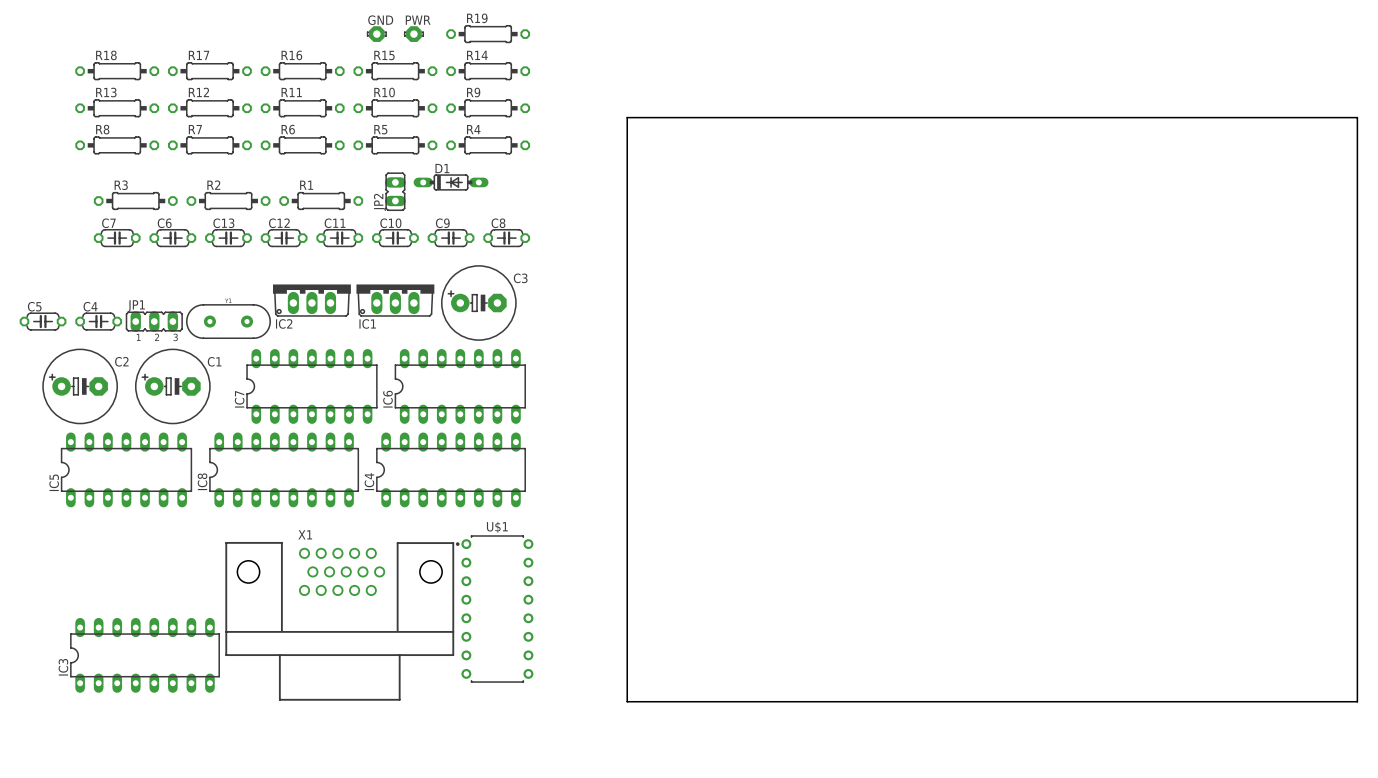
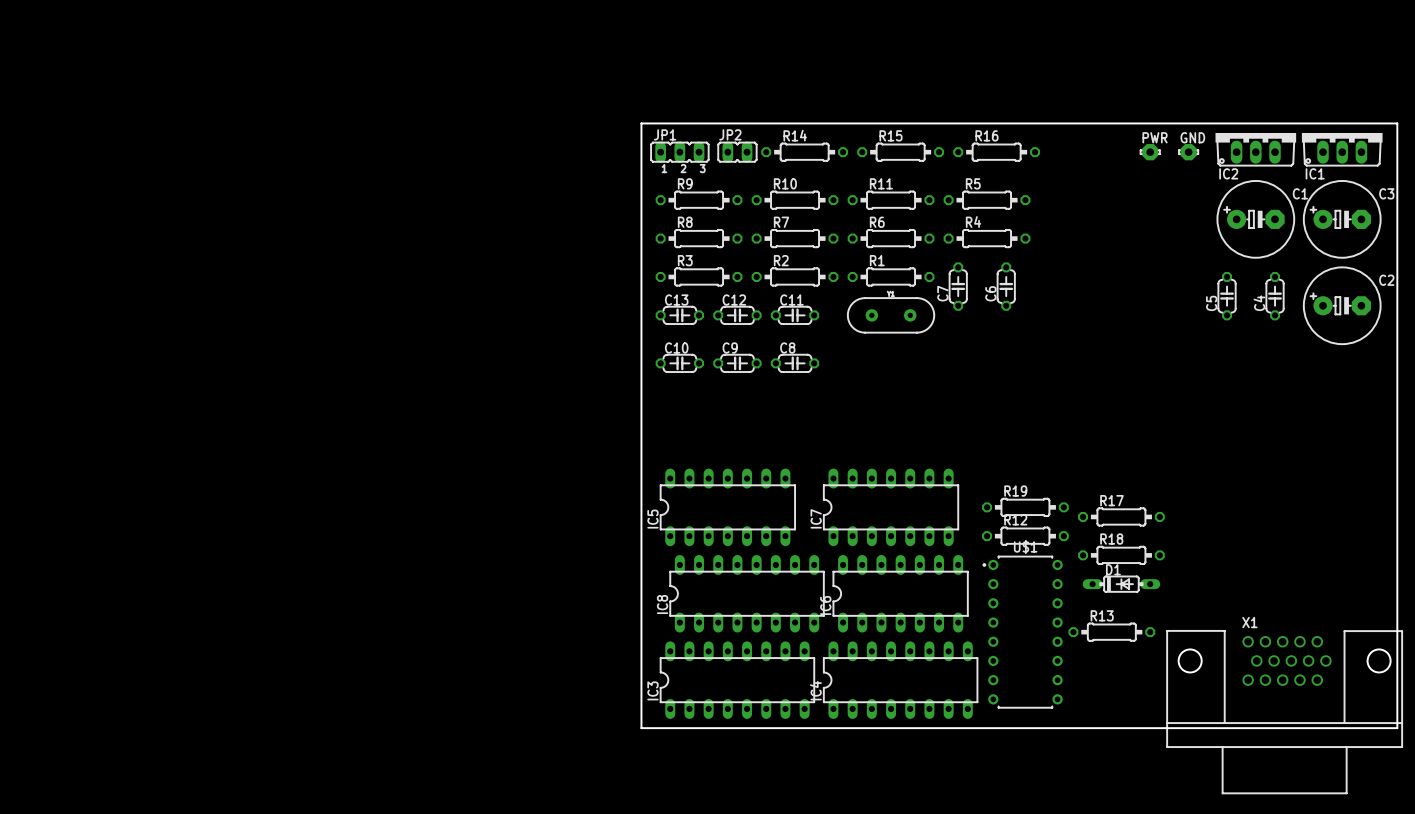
GND: (376, 34) -> none
PWR: (413, 34) -> none
R19 position: (488, 34) -> (1025, 507)
R18 position: (117, 71) -> (1121, 555)
R17 position: (209, 71) -> (1121, 516)
R16 position: (302, 71) -> (996, 152)
R15 position: (395, 71) -> (900, 152)
R14 position: (488, 71) -> (804, 152)
R13 position: (117, 108) -> (1111, 632)
R12 position: (209, 108) -> (1025, 536)
R11 position: (302, 108) -> (891, 200)
R10 position: (395, 108) -> (795, 200)
R9 position: (488, 108) -> (699, 200)
R8 position: (117, 145) -> (699, 238)
R7 position: (209, 145) -> (795, 238)
R6 position: (302, 145) -> (891, 238)
R5 position: (395, 145) -> (987, 200)
R4 position: (488, 145) -> (987, 238)
PWR: none -> (1150, 152)
GND: none -> (1188, 152)
D1 position: (451, 182) -> (1121, 584)
JP2 rotation: 0° (395, 191) -> 90° clockwise (737, 152)
JP2 position: (395, 191) -> (737, 152)
R3 position: (135, 201) -> (699, 276)
R2 position: (228, 201) -> (795, 276)
R1 position: (321, 201) -> (891, 276)
C7 rotation: 0° (117, 238) -> 90° counterclockwise (958, 286)
C7 position: (117, 238) -> (958, 286)
C6 rotation: 0° (172, 238) -> 90° counterclockwise (1006, 286)
C6 position: (172, 238) -> (1006, 286)
C13 position: (228, 238) -> (679, 315)
C12 position: (284, 238) -> (737, 315)
C11 position: (339, 238) -> (795, 315)
C10 position: (395, 238) -> (679, 363)
C9 position: (451, 238) -> (737, 363)
C8 position: (506, 238) -> (795, 363)
IC2 position: (311, 300) -> (1255, 149)
IC1 position: (395, 300) -> (1342, 149)
C3 position: (478, 303) -> (1342, 219)
C5 rotation: 0° (43, 321) -> 90° counterclockwise (1227, 296)
C5 position: (43, 321) -> (1227, 296)
C4 rotation: 0° (98, 321) -> 90° counterclockwise (1275, 296)
C4 position: (98, 321) -> (1275, 296)
JP1 position: (154, 321) -> (679, 152)
part position: (228, 321) -> (891, 315)
C2 position: (80, 386) -> (1342, 305)
C1 position: (172, 386) -> (1255, 219)
IC7 position: (311, 386) -> (891, 507)
IC6 position: (460, 386) -> (900, 593)
IC5 position: (126, 469) -> (727, 507)
IC8 position: (284, 469) -> (747, 593)
IC4 position: (451, 469) -> (900, 680)
U$1 position: (494, 609) -> (1022, 632)
X1 position: (339, 621) -> (1284, 712)
IC3 position: (145, 655) -> (737, 680)

